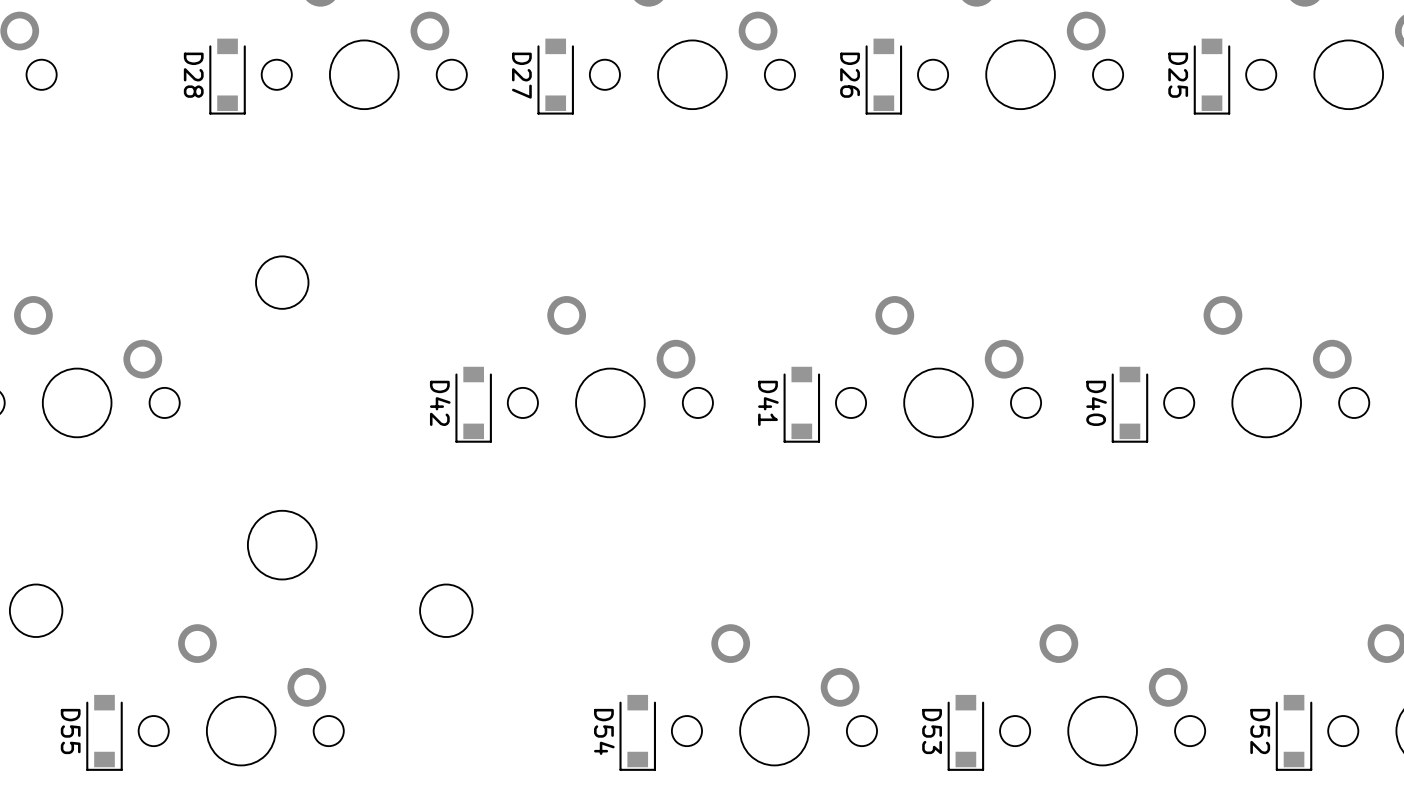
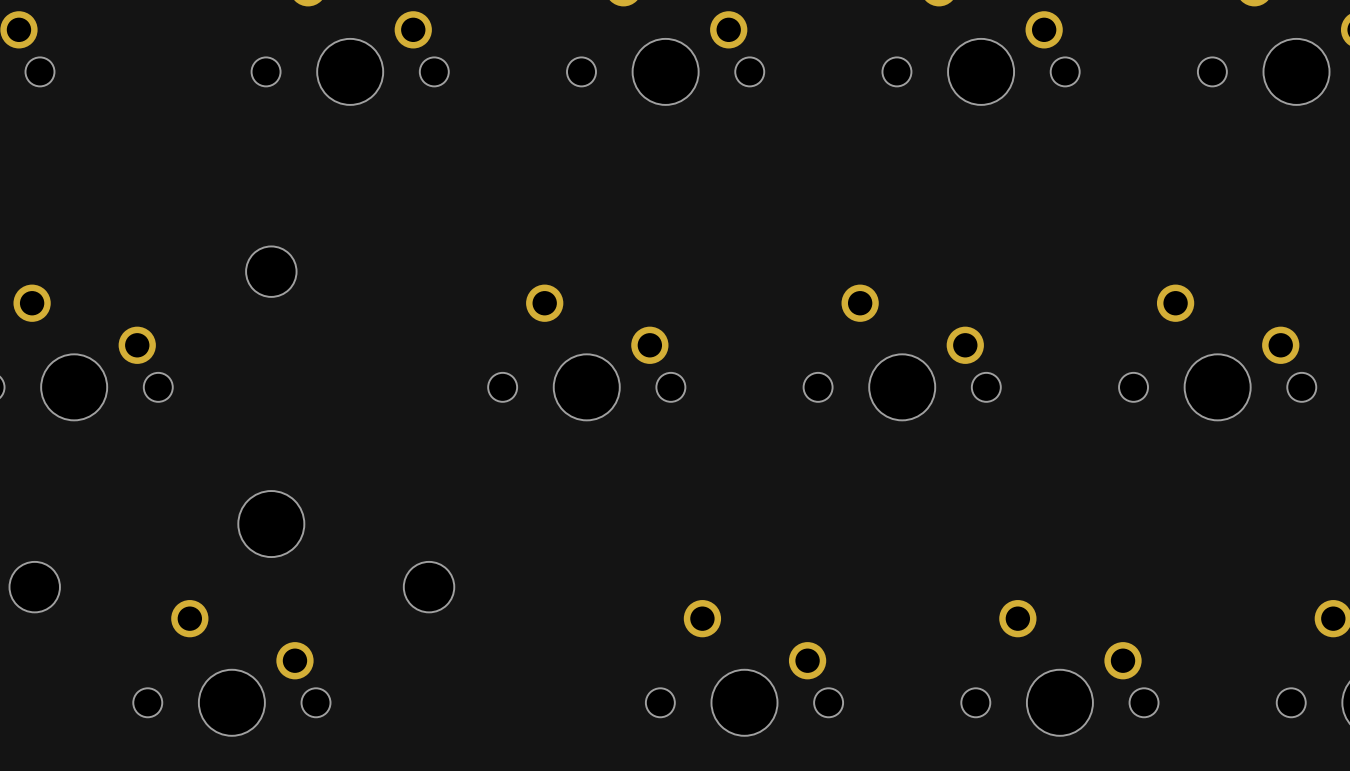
D28: (227, 76) -> none
D27: (555, 76) -> none
D26: (883, 76) -> none
D25: (1211, 76) -> none
D42: (473, 404) -> none
D41: (801, 404) -> none
D40: (1129, 404) -> none
D55: (104, 732) -> none
D54: (637, 732) -> none
D53: (965, 732) -> none
D52: (1294, 732) -> none

